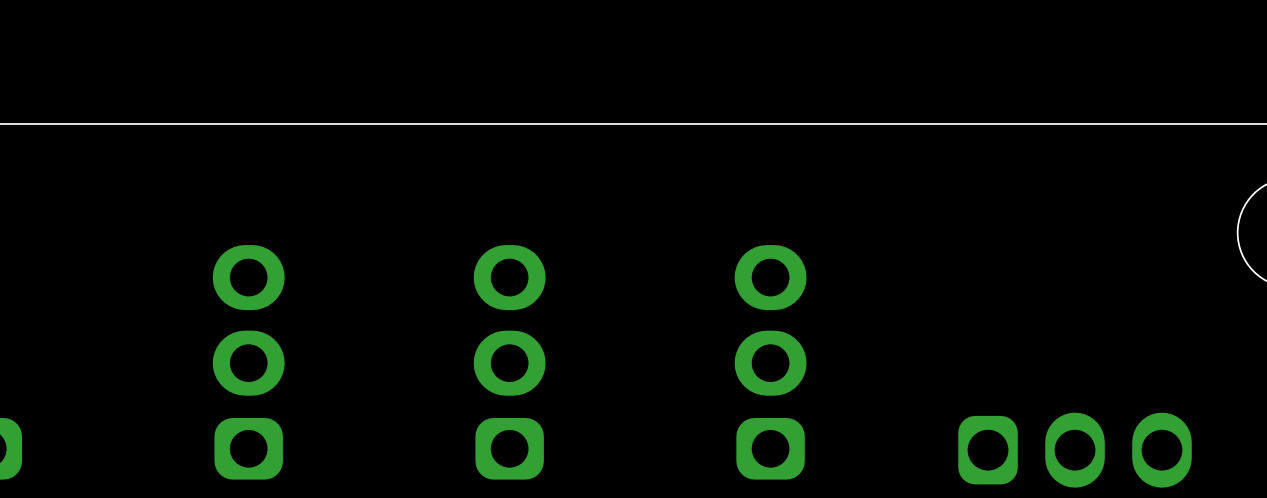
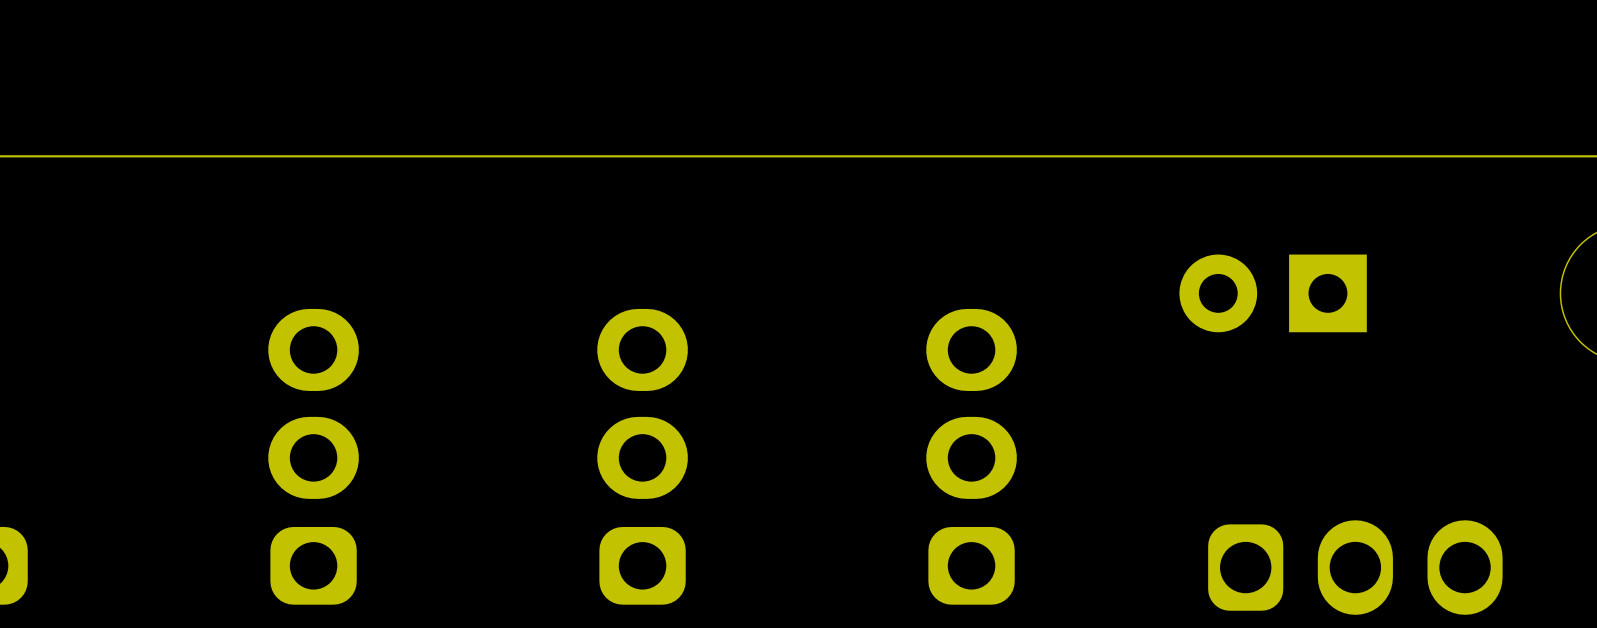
part: none -> (1273, 293)

